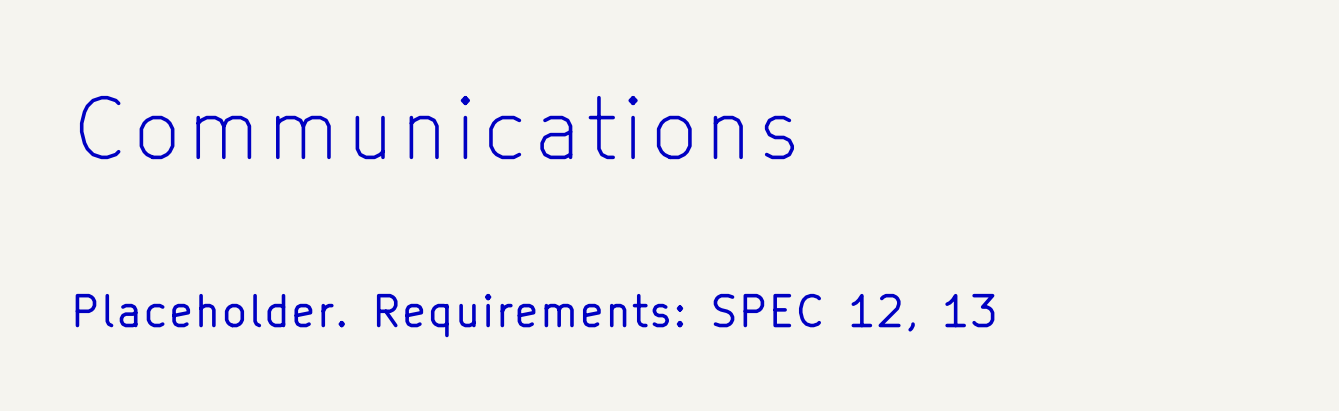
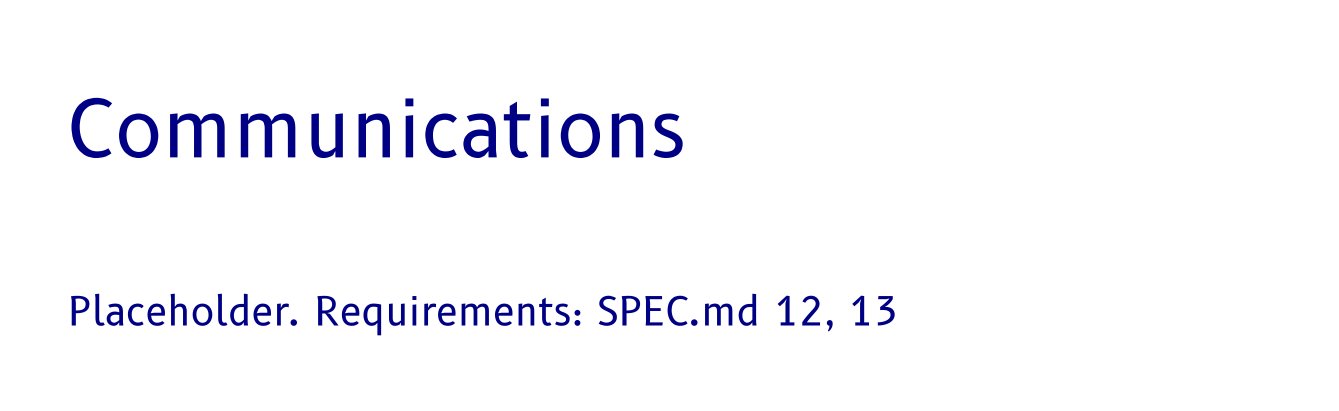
text: Placeholder. Requirements: SPEC 12, 13 (535, 315) -> Placeholder. Requirements: SPEC.md 12, 13 (482, 314)

